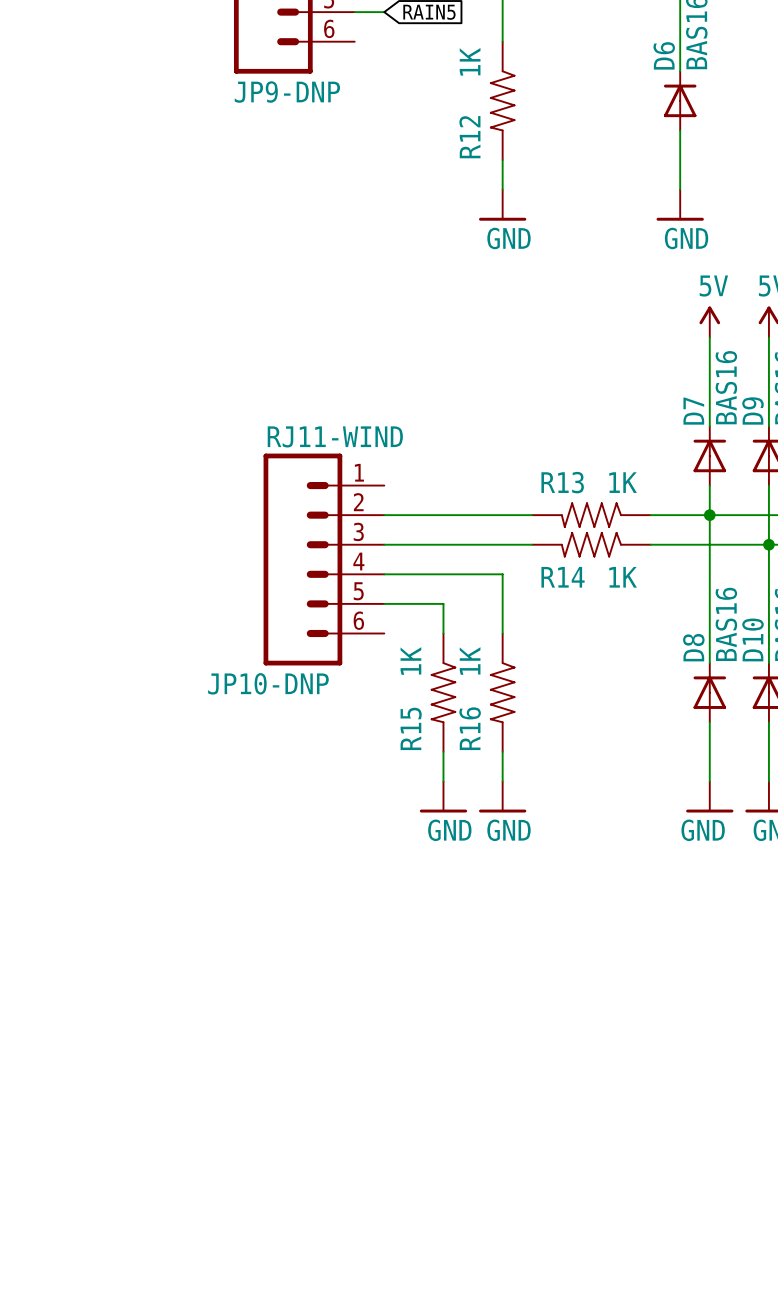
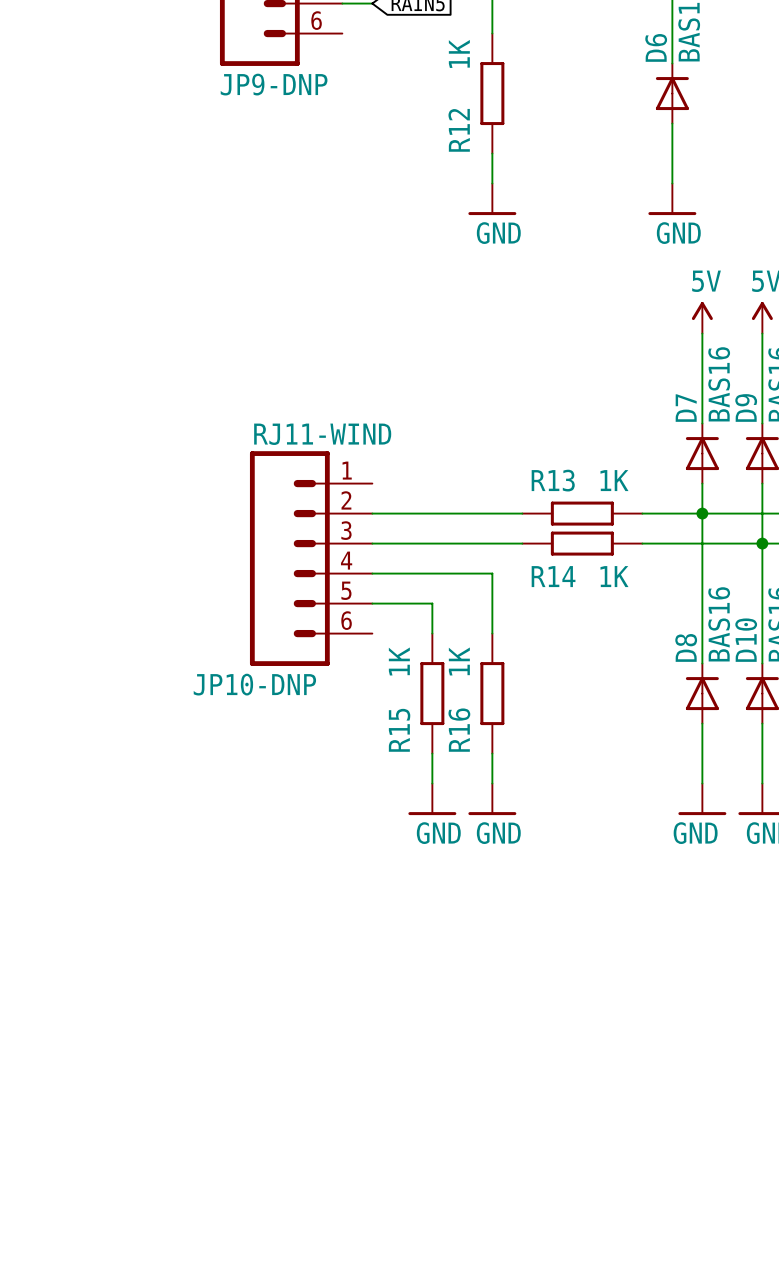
R12 symbol: [489, 41, 516, 161] -> [480, 33, 505, 154]
R13 symbol: [532, 502, 651, 528] -> [522, 501, 643, 526]
R14 symbol: [532, 532, 651, 558] -> [522, 531, 643, 556]
R15 symbol: [430, 633, 457, 752] -> [420, 633, 445, 754]
R16 symbol: [489, 633, 516, 752] -> [480, 633, 505, 754]

